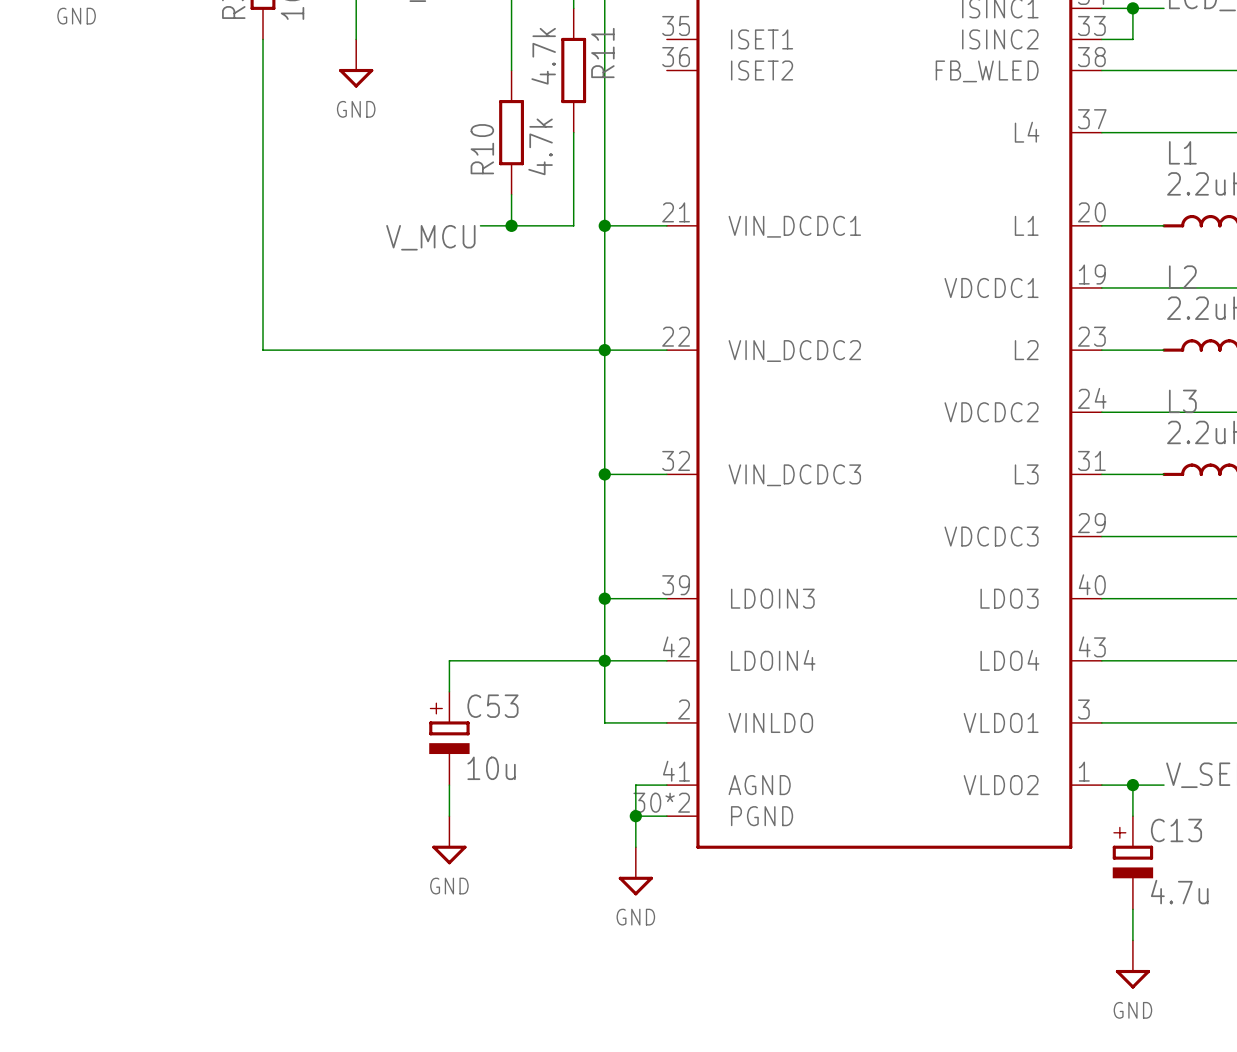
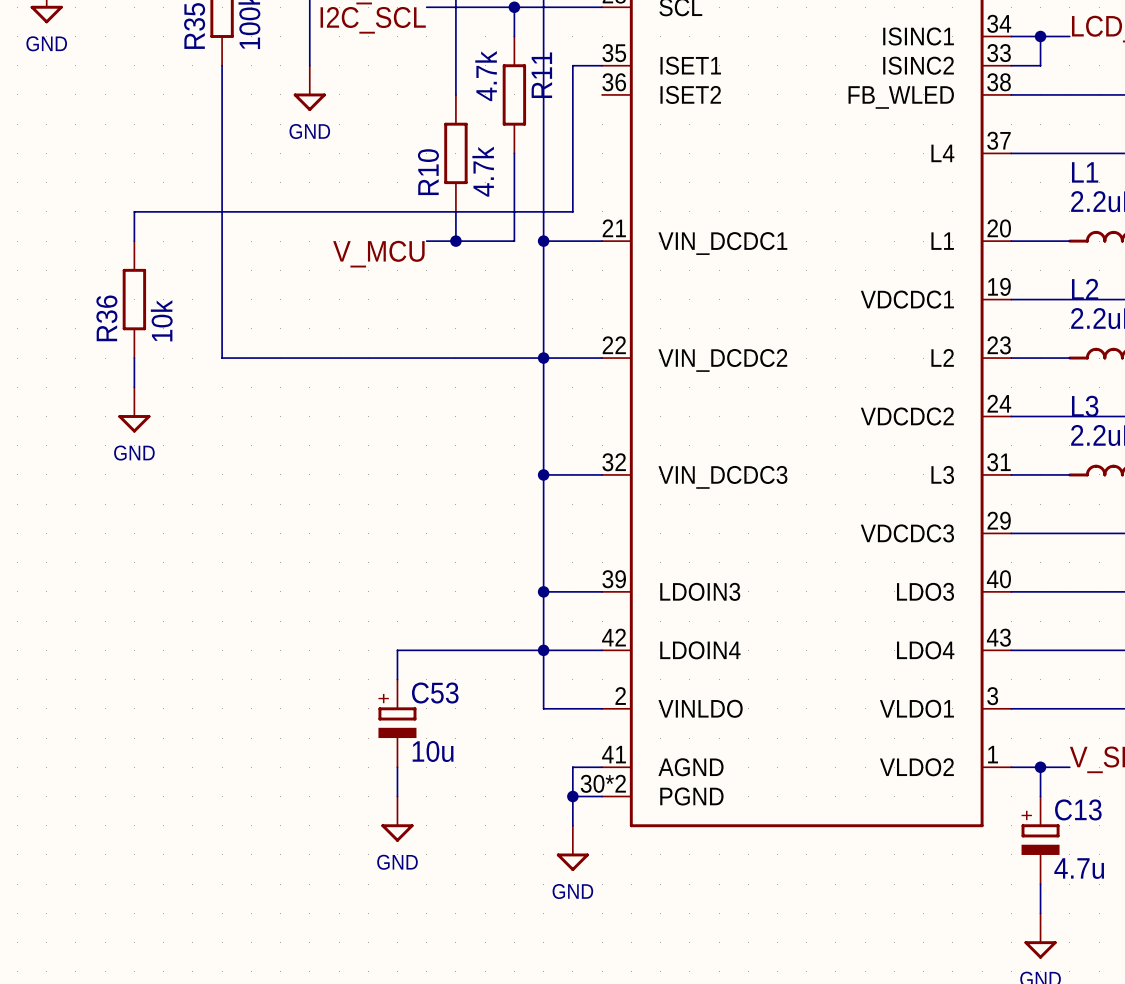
wire: none -> (602, 65) (572, 65) (572, 211) (134, 211) (134, 241)
R36: none -> 10k (134, 299)
wire: none -> (134, 358) (134, 387)
power symbol: none -> GND (134, 409)

